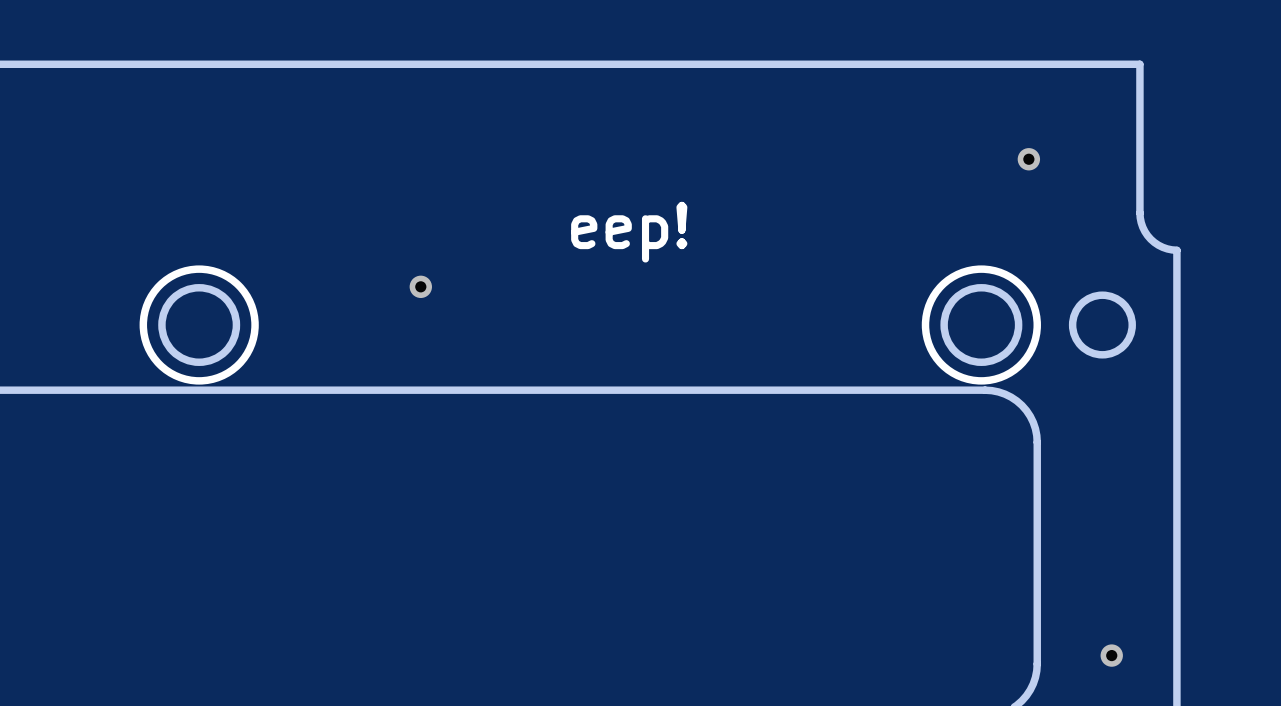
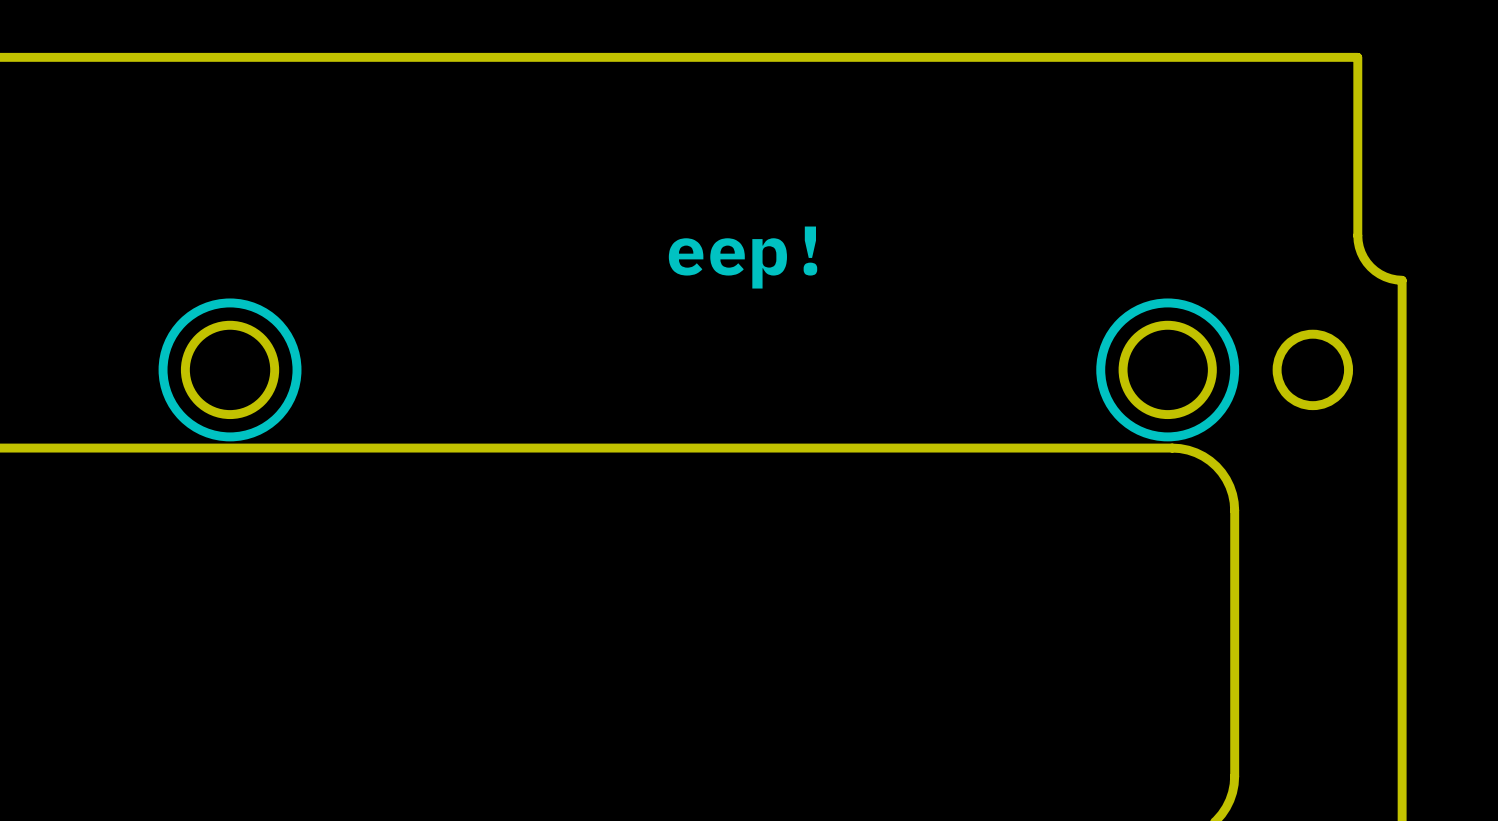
via: (1028, 159) -> none
via: (420, 286) -> none
via: (1111, 655) -> none

